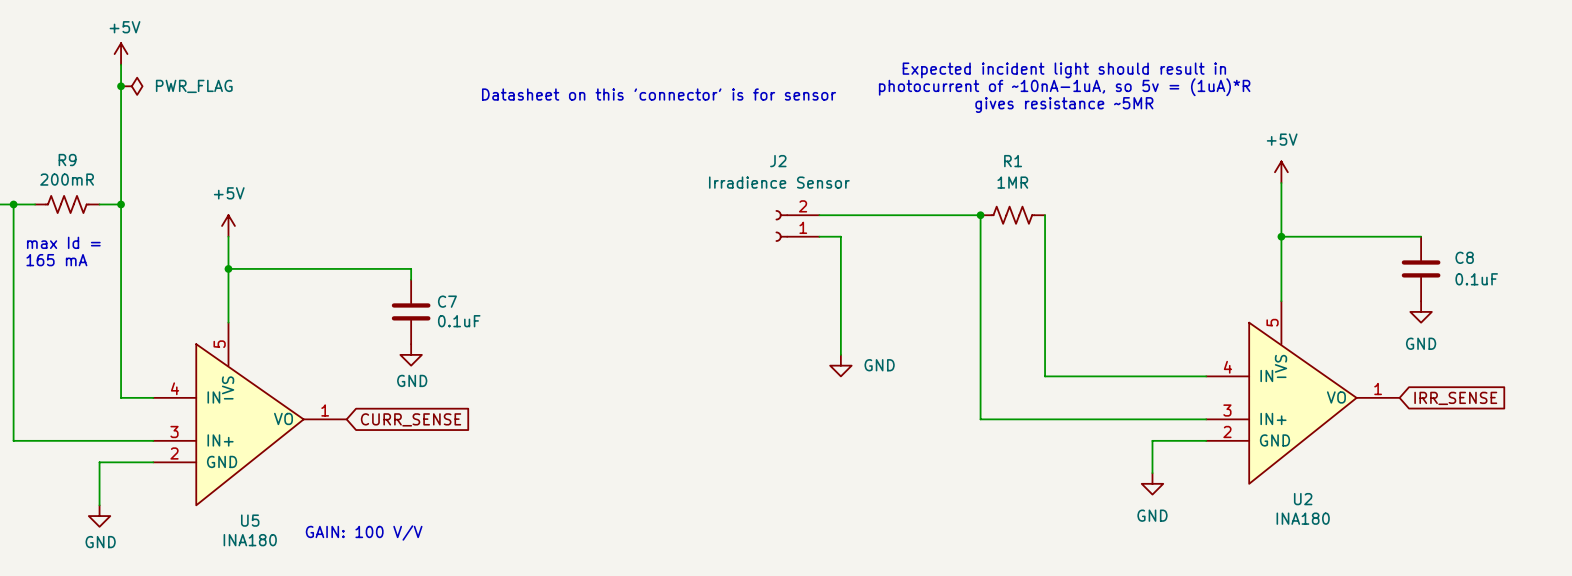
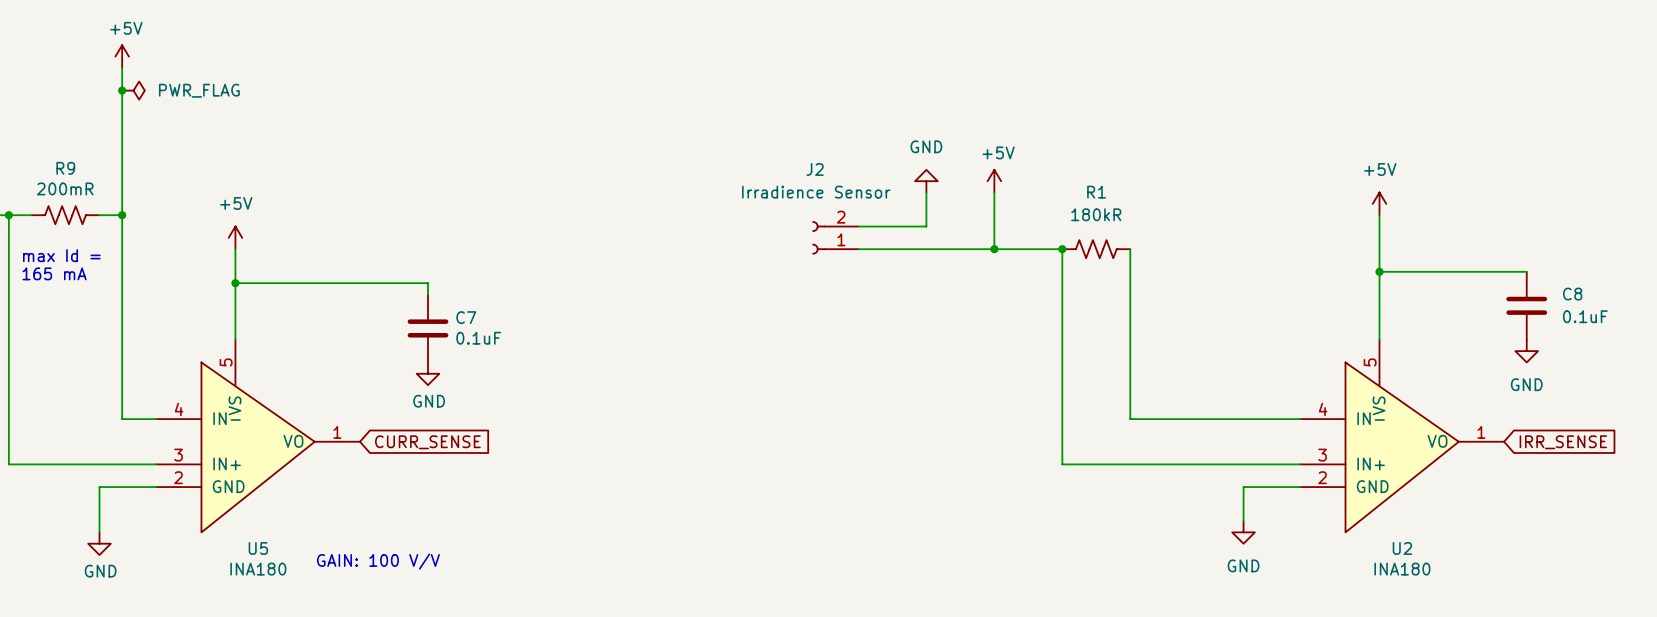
text: Expected incident light should result in (1064, 70) -> none
text: photocurrent of ~10nA-1uA, so 5v = (1uA)*R (1064, 87) -> none
text: Datasheet on this 'connector' is for sensor (659, 94) -> none
text: gives resistance ~5MR (1064, 105) -> none
power symbol: none -> GND (926, 181)
power symbol: none -> +5V (994, 181)
power symbol position: +5V (1281, 172) -> +5V (1379, 203)
wire: none -> (994, 192) (994, 249)
R1 value: 1MR (1012, 182) -> 180kR (1096, 214)
wire: (1281, 182) (1281, 301) -> (1379, 215) (1379, 339)
wire: (883, 215) (980, 215) (980, 419) (1206, 419) -> (926, 226) (926, 192)
junction: (980, 215) -> none
R1 position: (1012, 215) -> (1096, 249)
wire: (1045, 215) (1045, 376) (1206, 376) -> (1130, 249) (1130, 419) (1300, 419)
wire: (840, 236) (840, 354) -> (881, 249) (1062, 249) (1062, 464) (1209, 464)
junction: none -> (994, 249)
junction: none -> (1062, 249)
wire: (1281, 236) (1421, 236) -> (1379, 271) (1526, 271)
junction position: (1281, 236) -> (1379, 271)
C8 position: (1421, 268) -> (1526, 305)
power symbol position: GND (1421, 311) -> GND (1526, 351)
power symbol: GND (840, 365) -> none
U2 position: (1302, 392) -> (1402, 436)
global label position: IRR_SENSE (1455, 398) -> IRR_SENSE (1563, 442)
wire: (1152, 440) (1152, 473) -> none
wire: none -> (1300, 487) (1243, 487) (1243, 521)
power symbol position: GND (1152, 483) -> GND (1243, 532)

